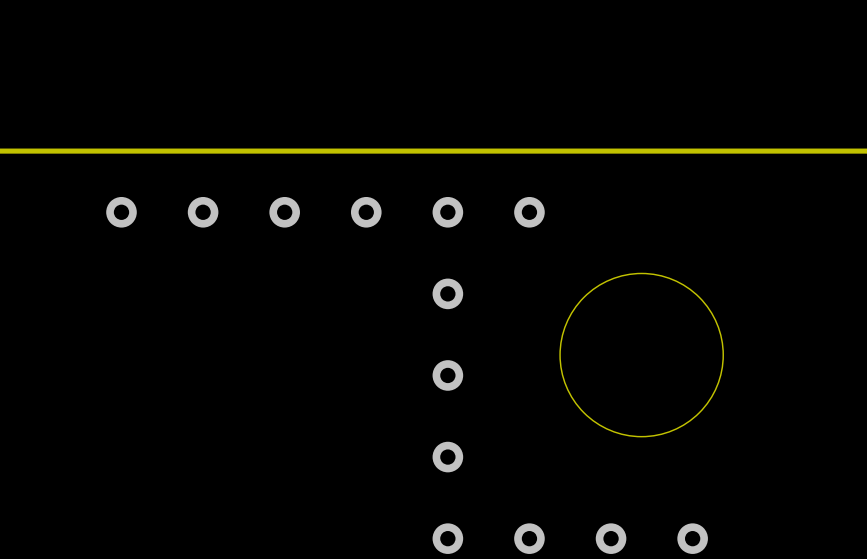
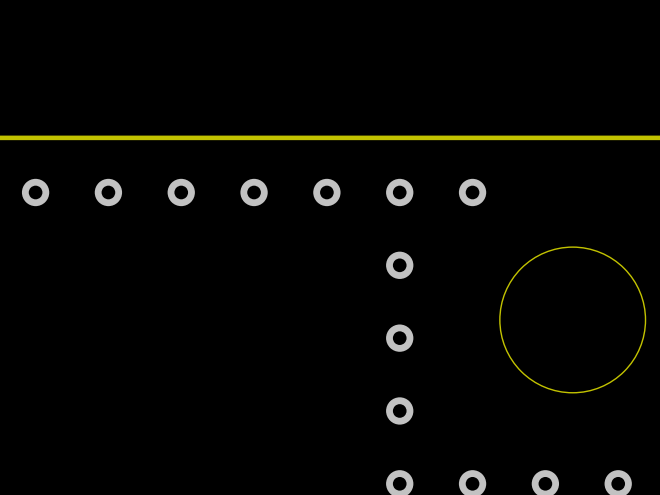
via: none -> (35, 192)

